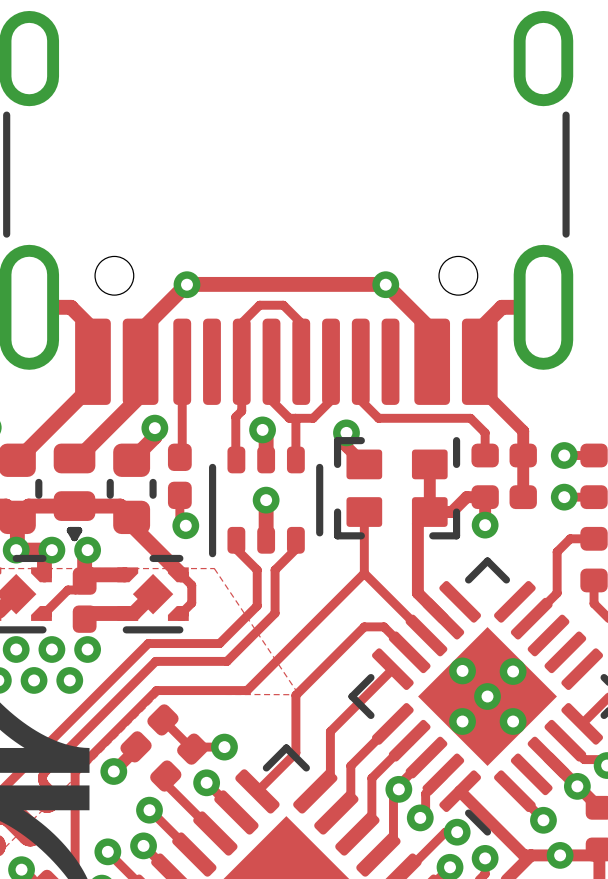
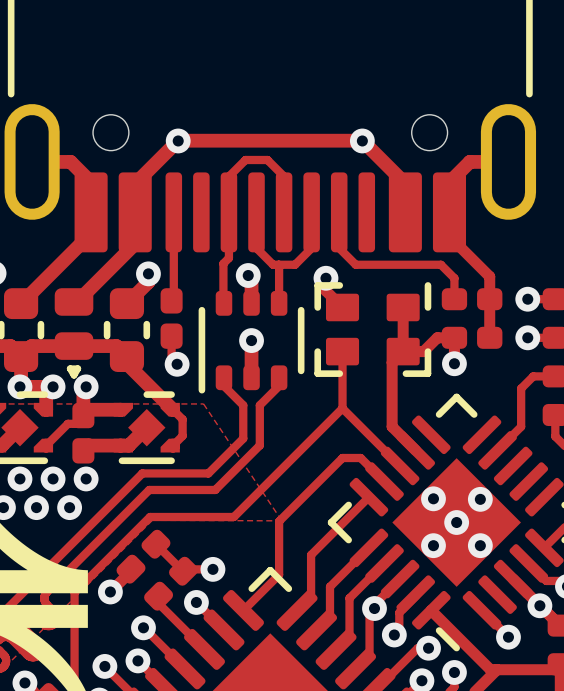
via: (560, 855) -> none

